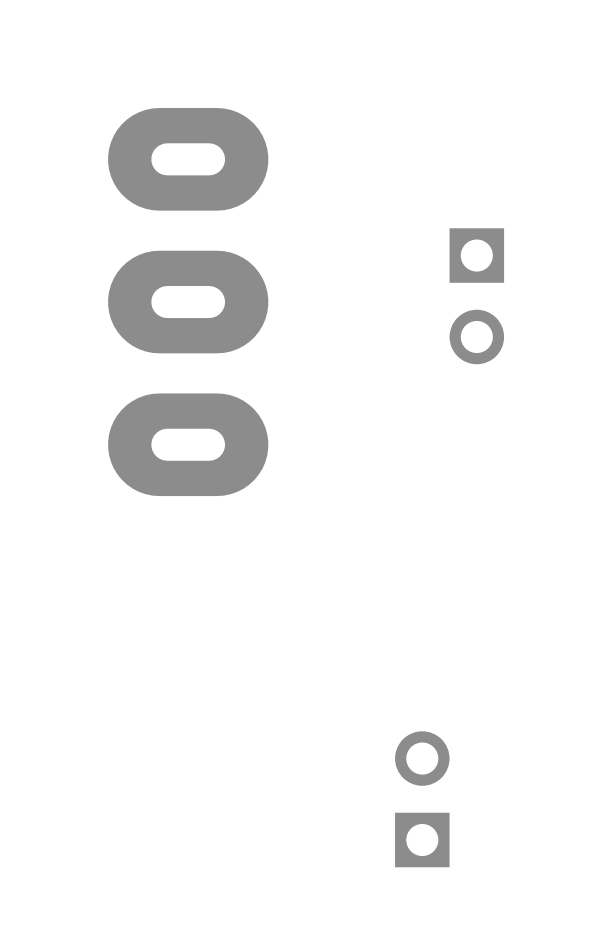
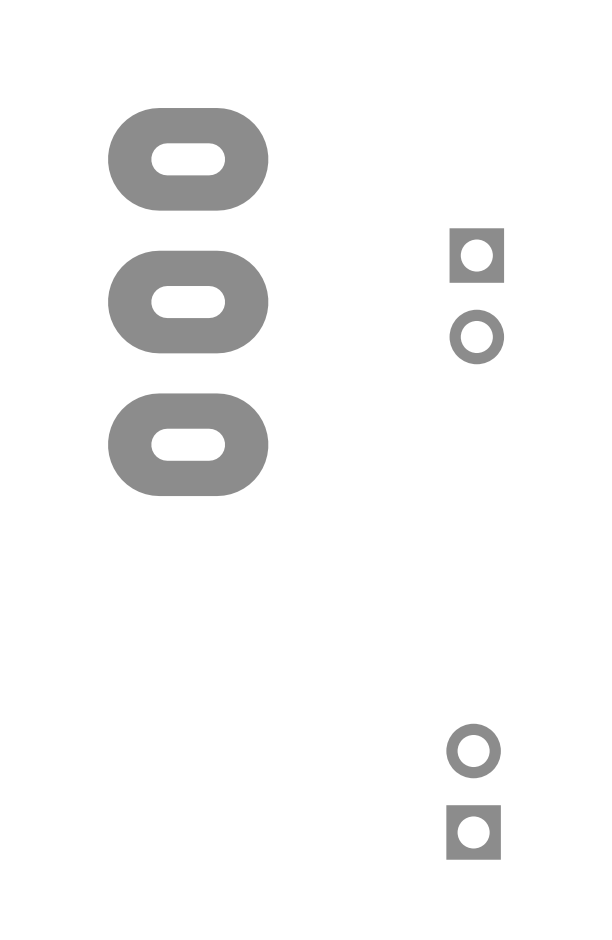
part position: (422, 799) -> (473, 791)

